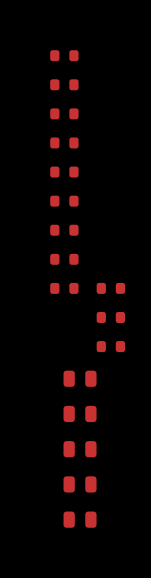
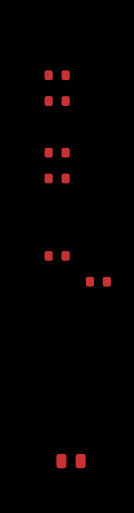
part: (64, 55) -> none
part: (64, 142) -> none
part: (64, 230) -> none
part: (64, 259) -> none
part: (110, 288) -> none
part: (110, 346) -> none
part: (80, 378) -> none
part: (80, 413) -> none
part: (80, 449) -> none
part: (80, 484) -> none

